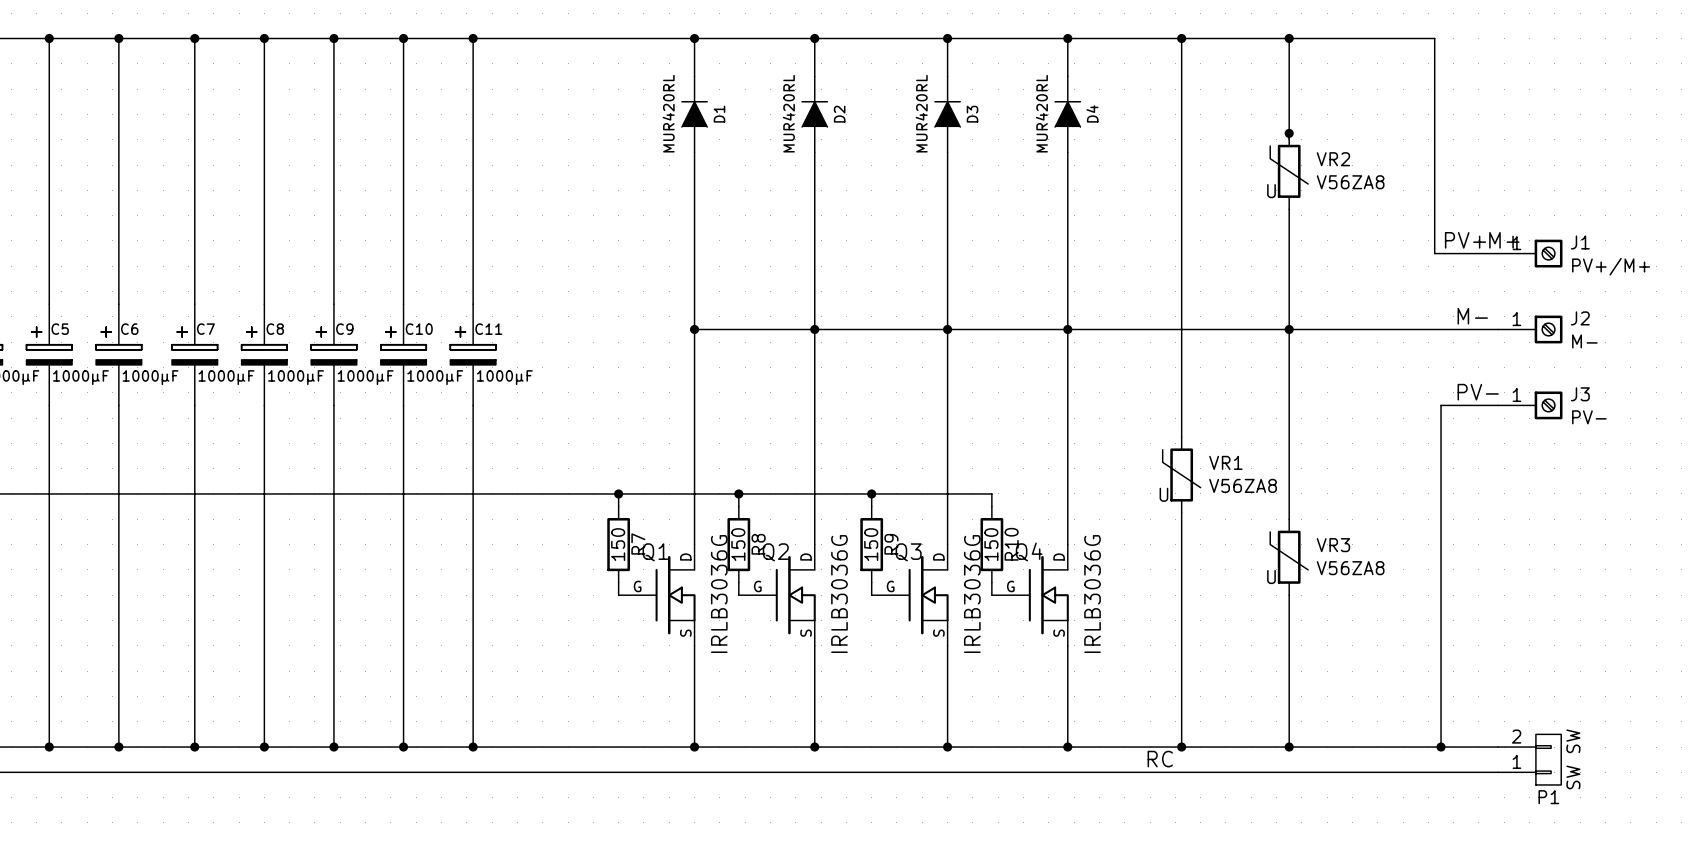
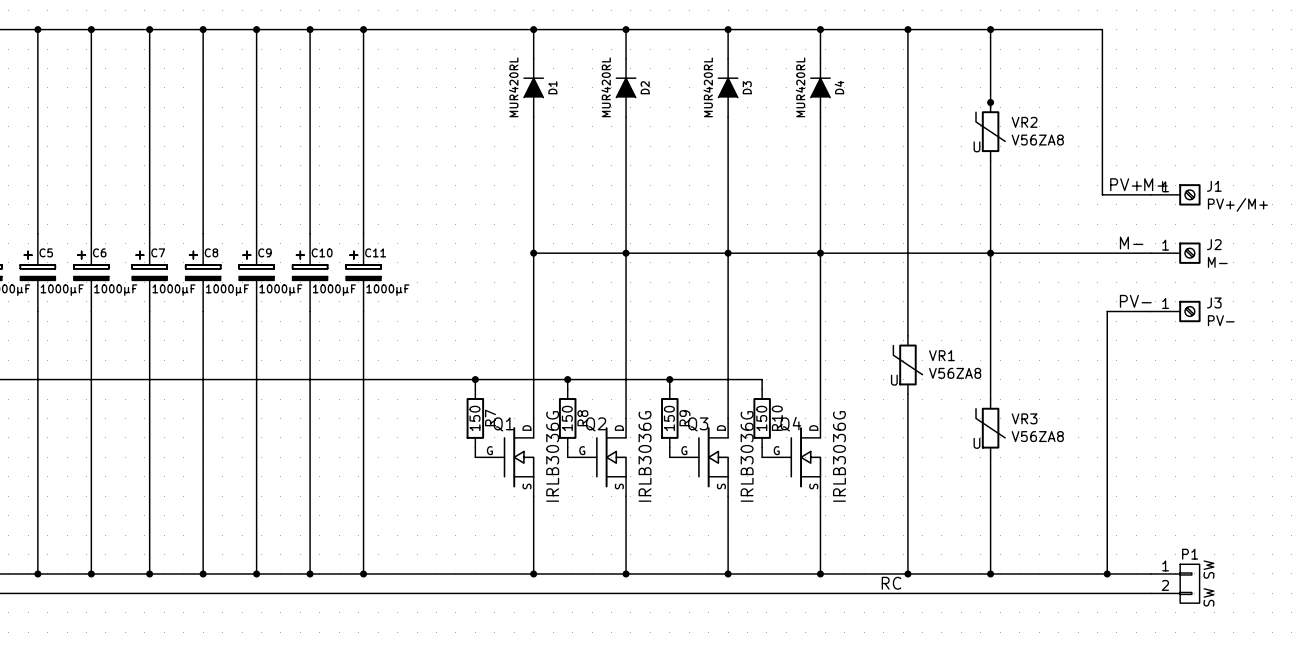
P1 flip: as is (1548, 759) -> up-down (1189, 583)

